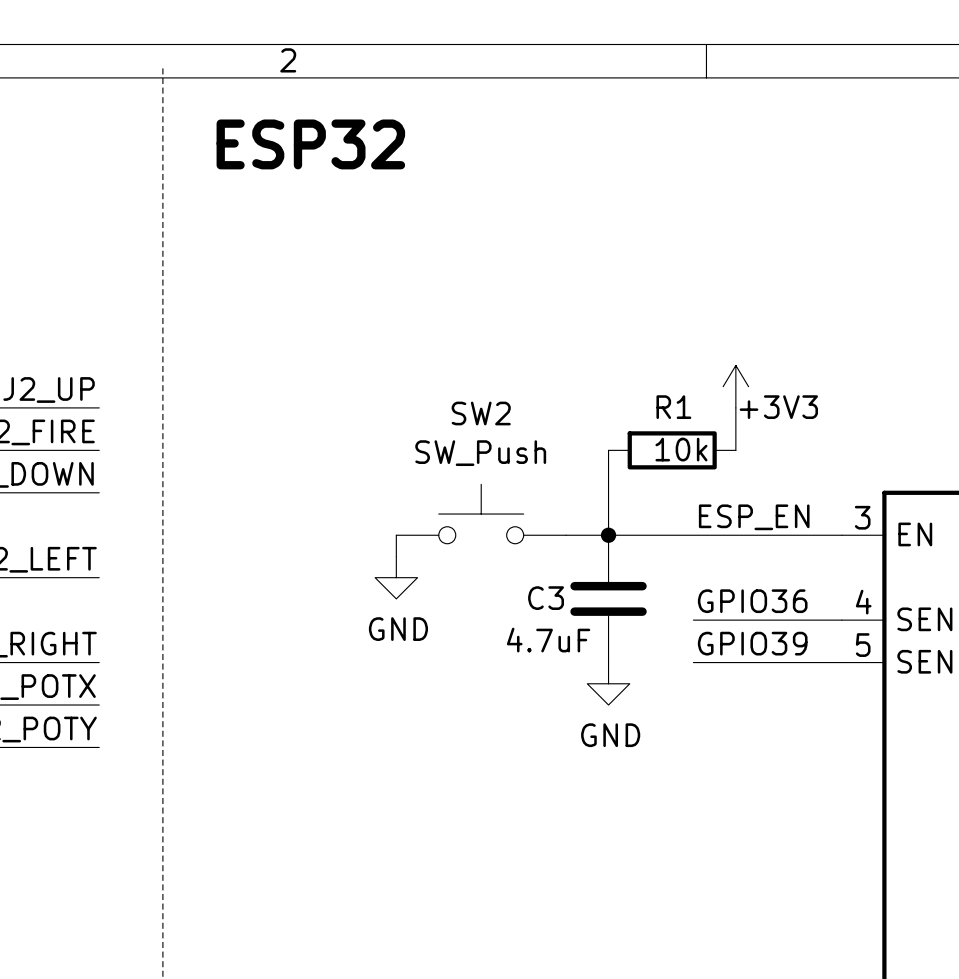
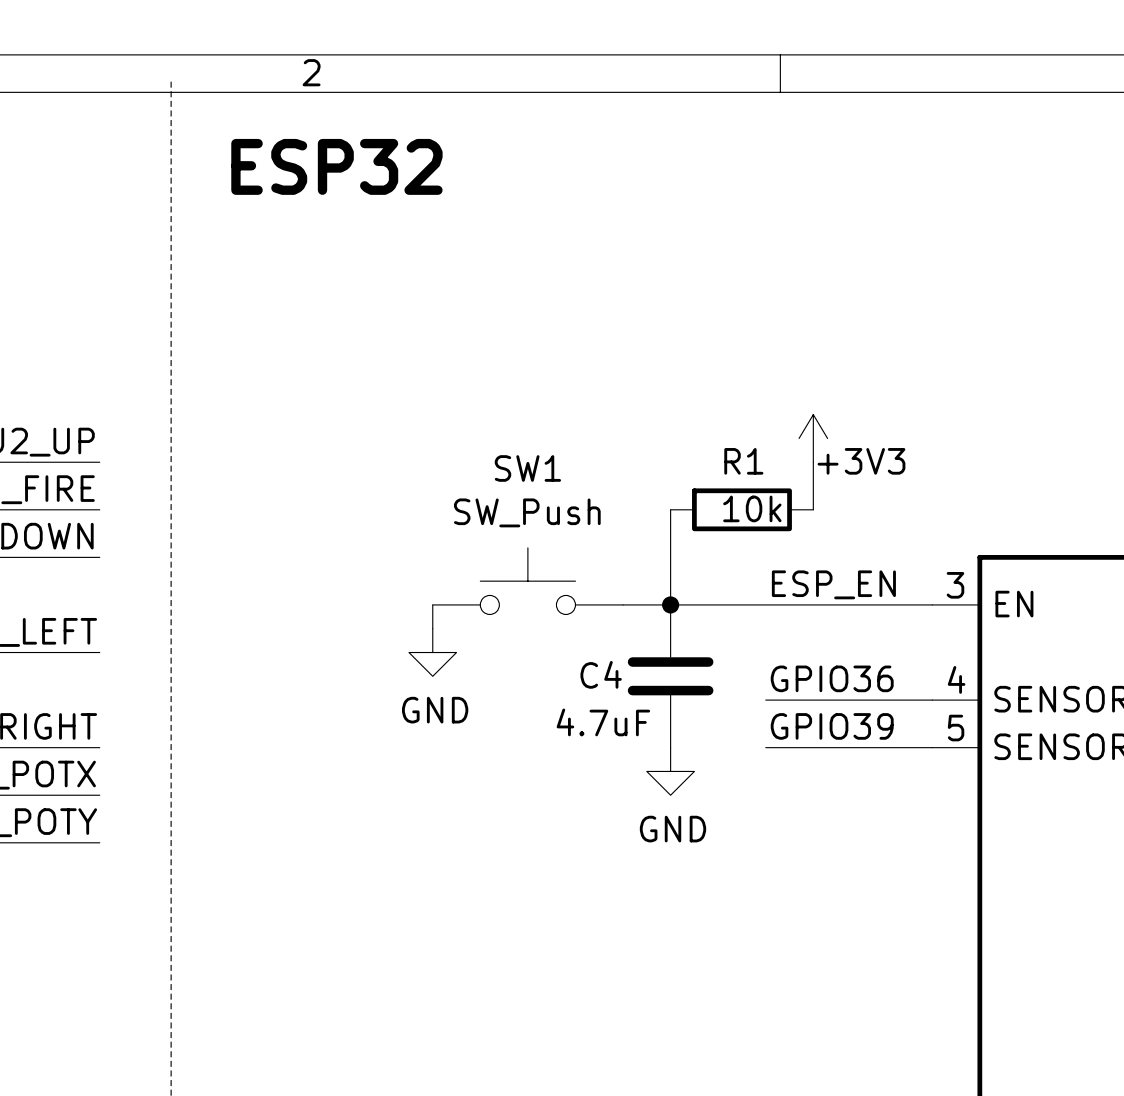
SW2 name: SW2 (481, 413) -> SW1 (527, 468)
C3 name: C3 (546, 598) -> C4 (601, 674)

